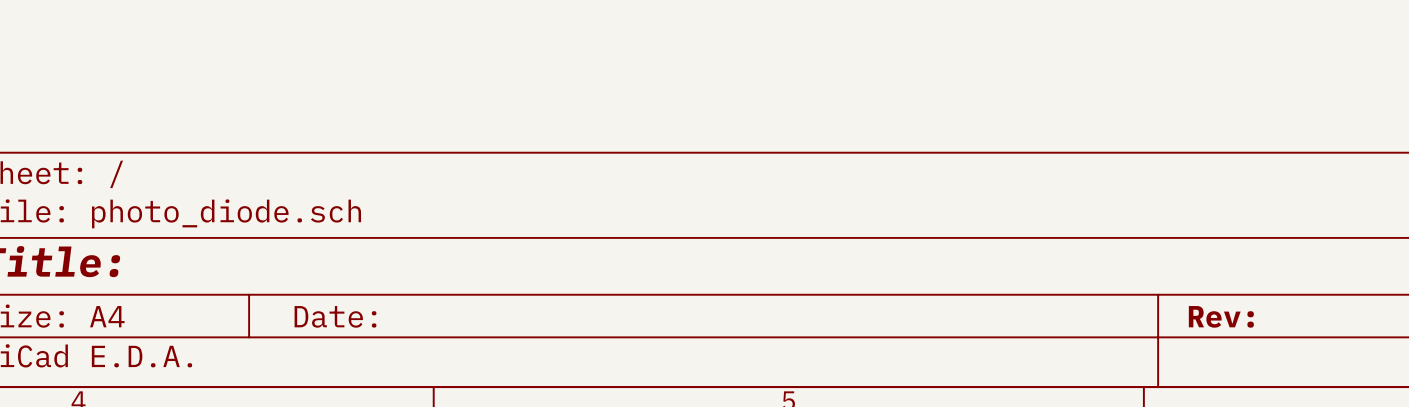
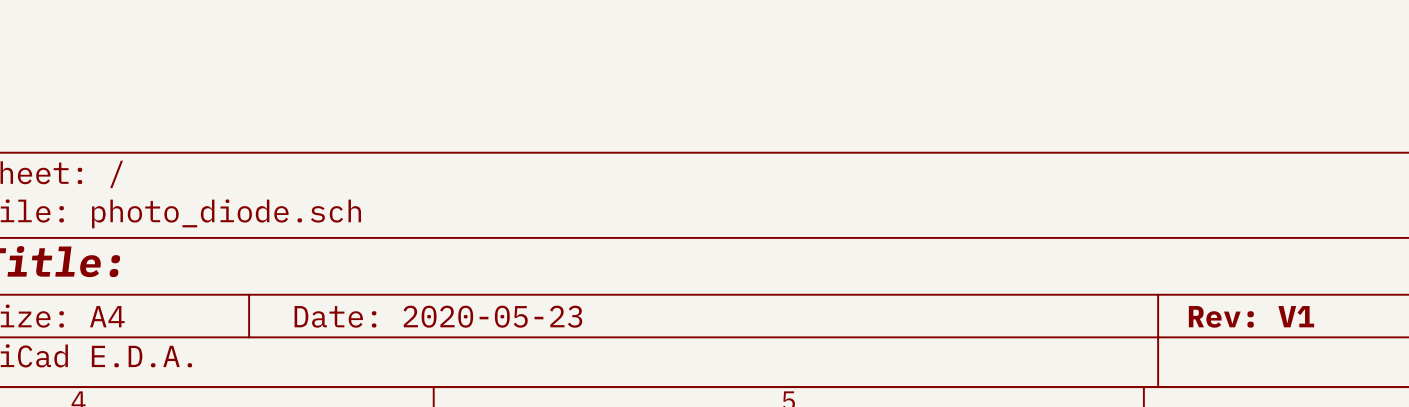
title block: Date: (335, 316) -> Date: 2020-05-23 (438, 316)
title block: Rev: (1221, 316) -> Rev: V1 (1251, 316)

